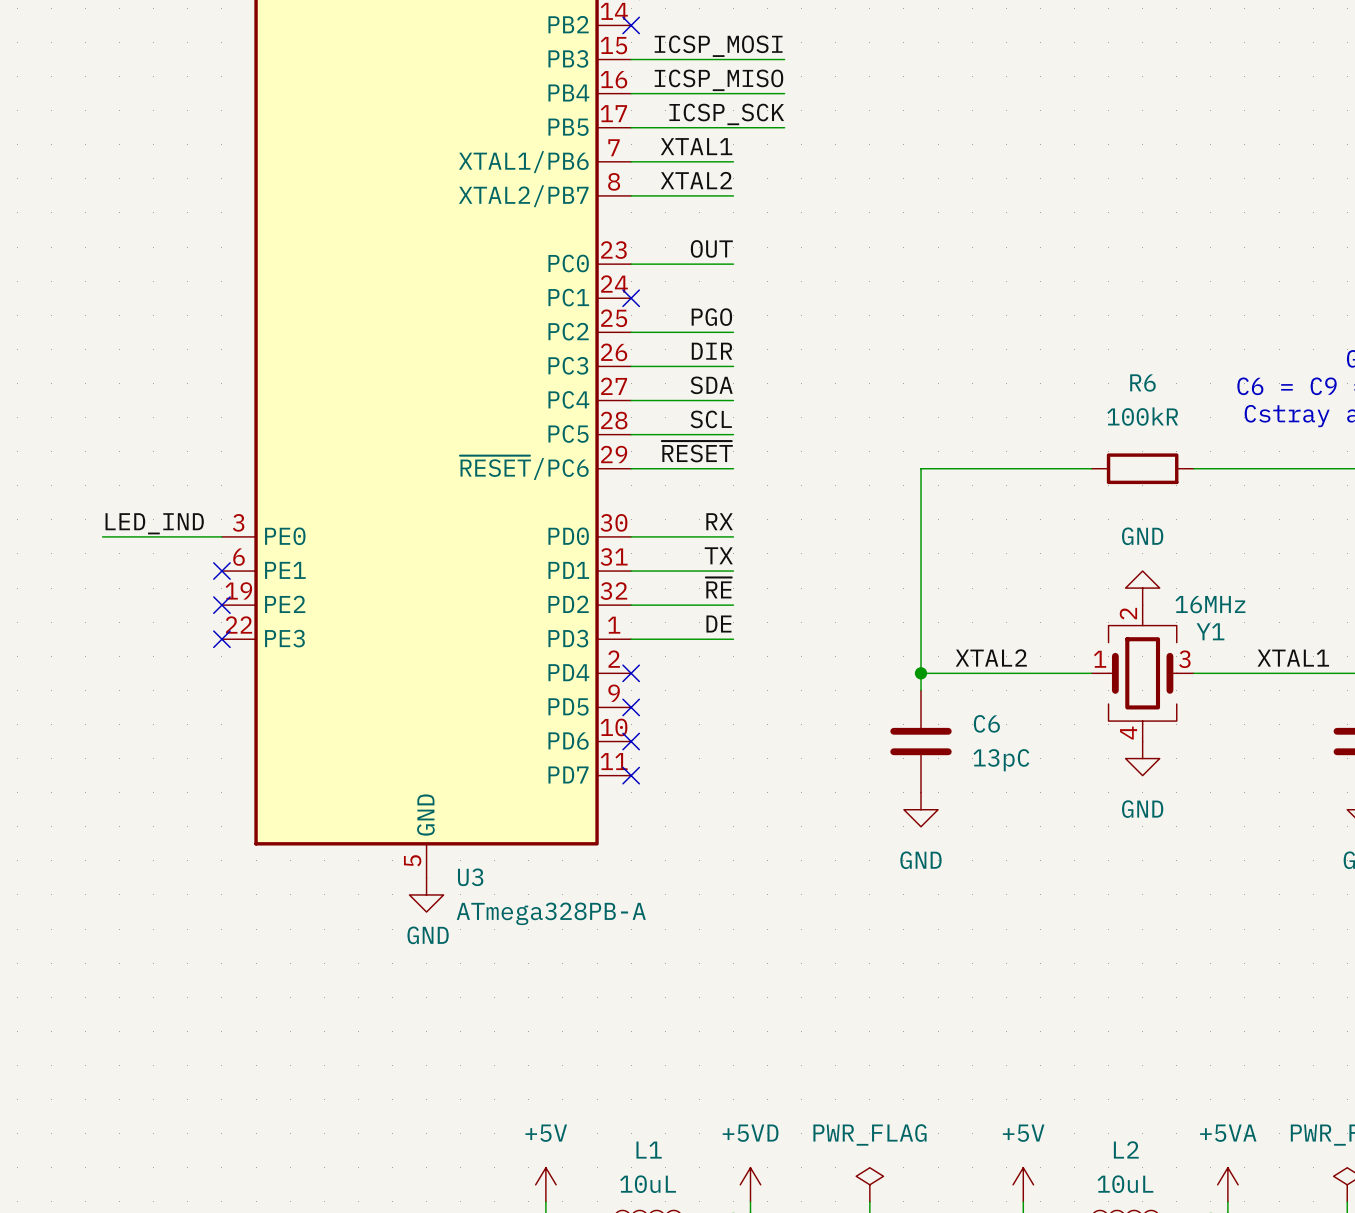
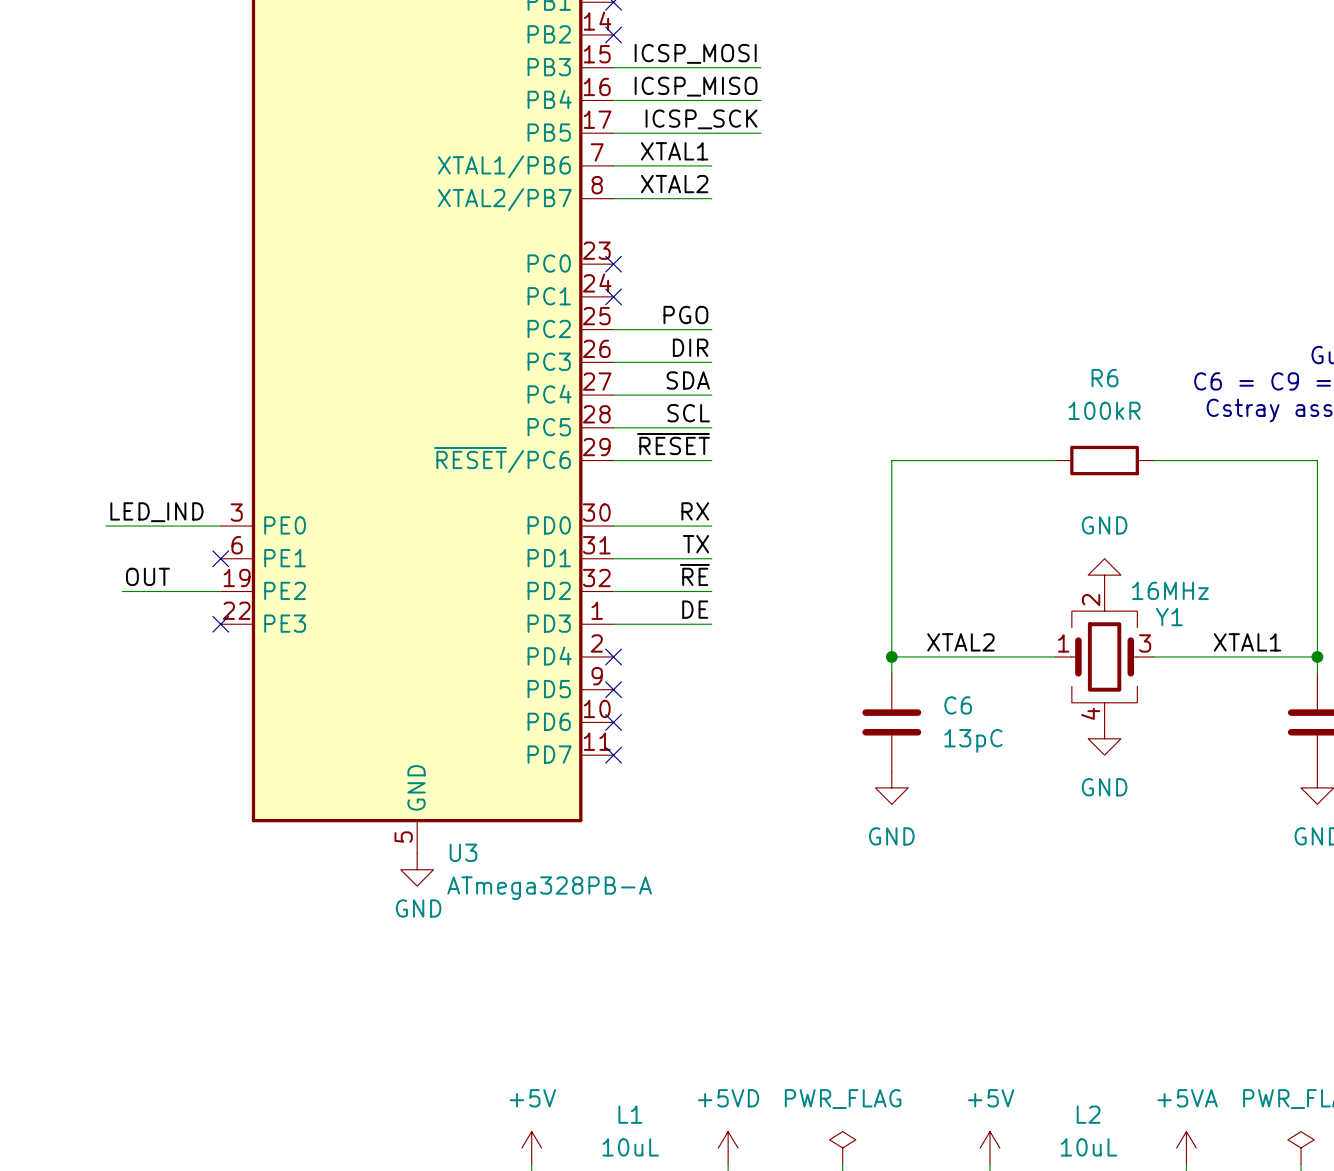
label: OUT (711, 248) -> none
wire: (631, 264) (733, 264) -> none
no-connect mark: none -> (613, 264)
label: none -> OUT (147, 576)
wire: none -> (122, 591) (220, 591)
no-connect mark: (221, 605) -> none

